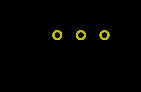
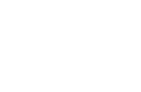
part: (80, 35) -> none

